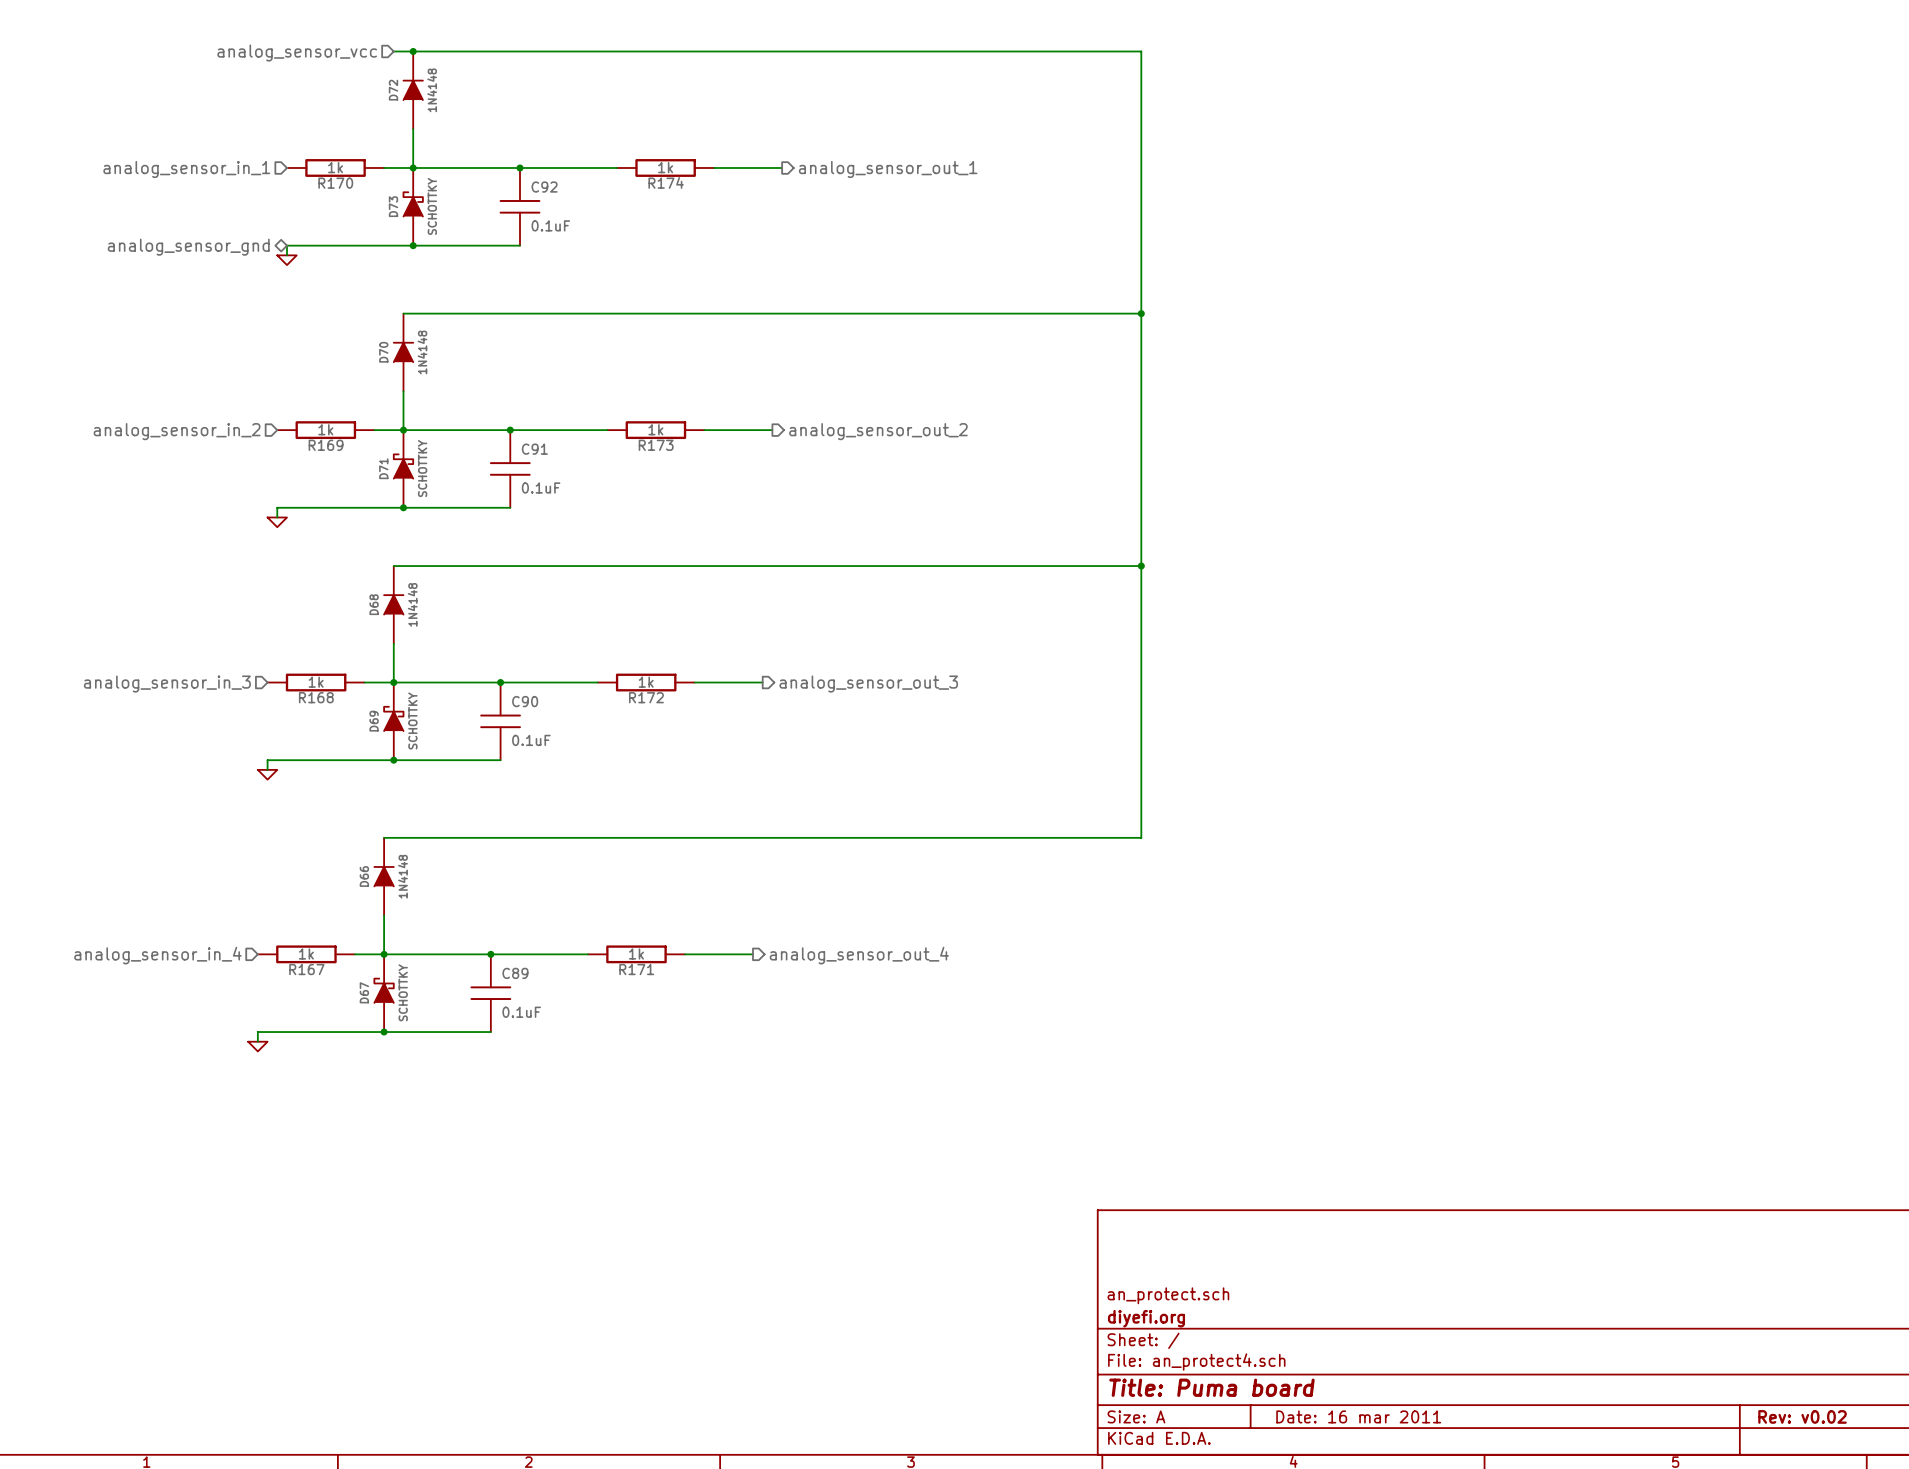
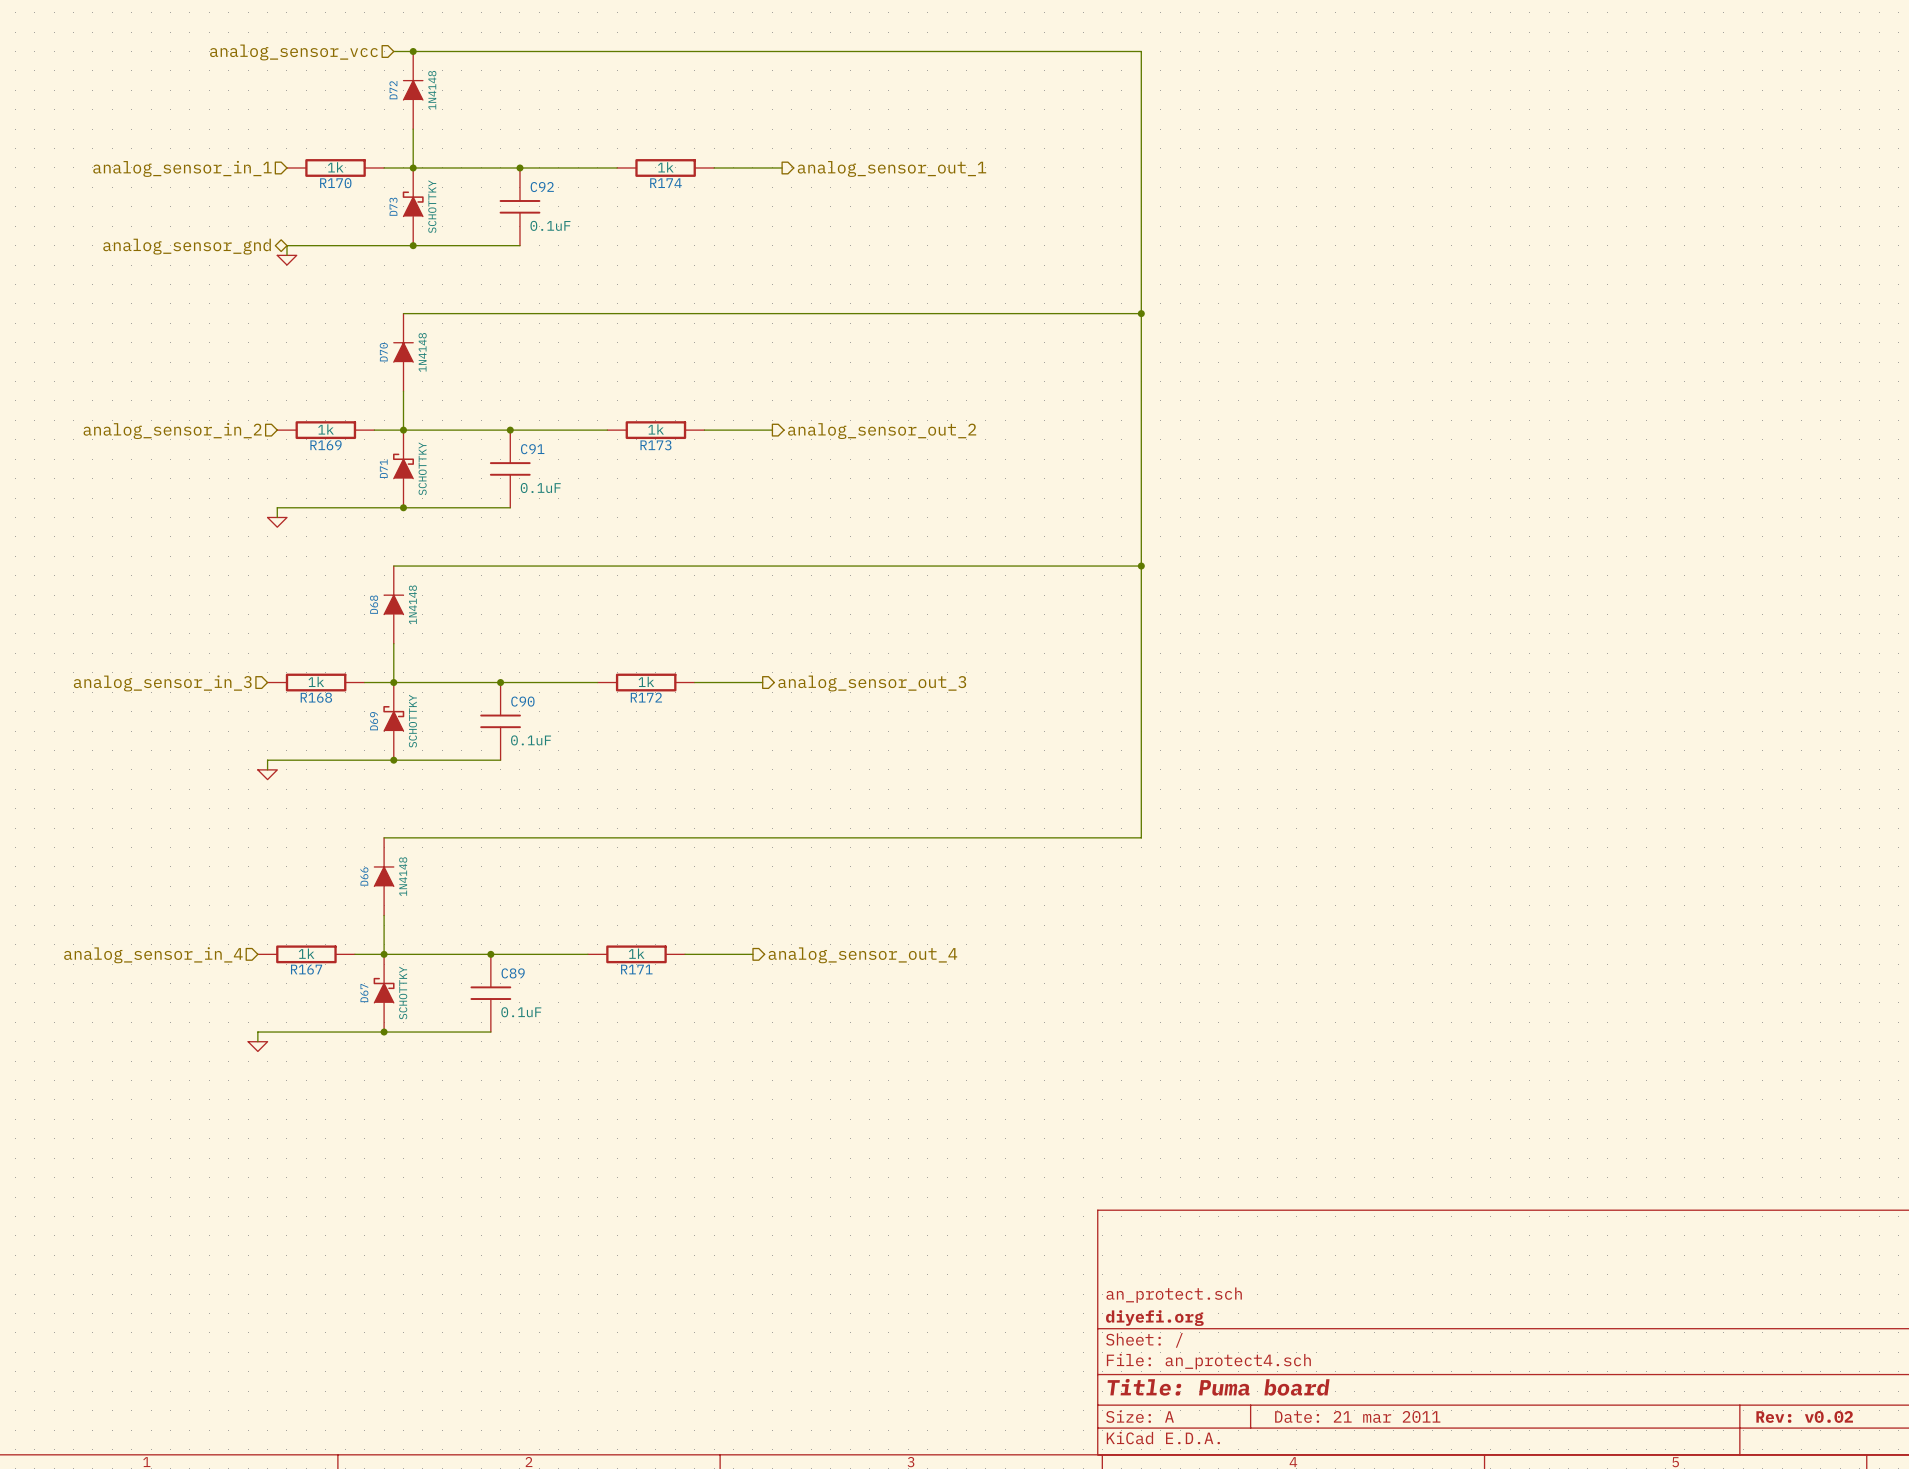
title block: Date: 16 mar 2011 (1358, 1416) -> Date: 21 mar 2011 (1357, 1416)

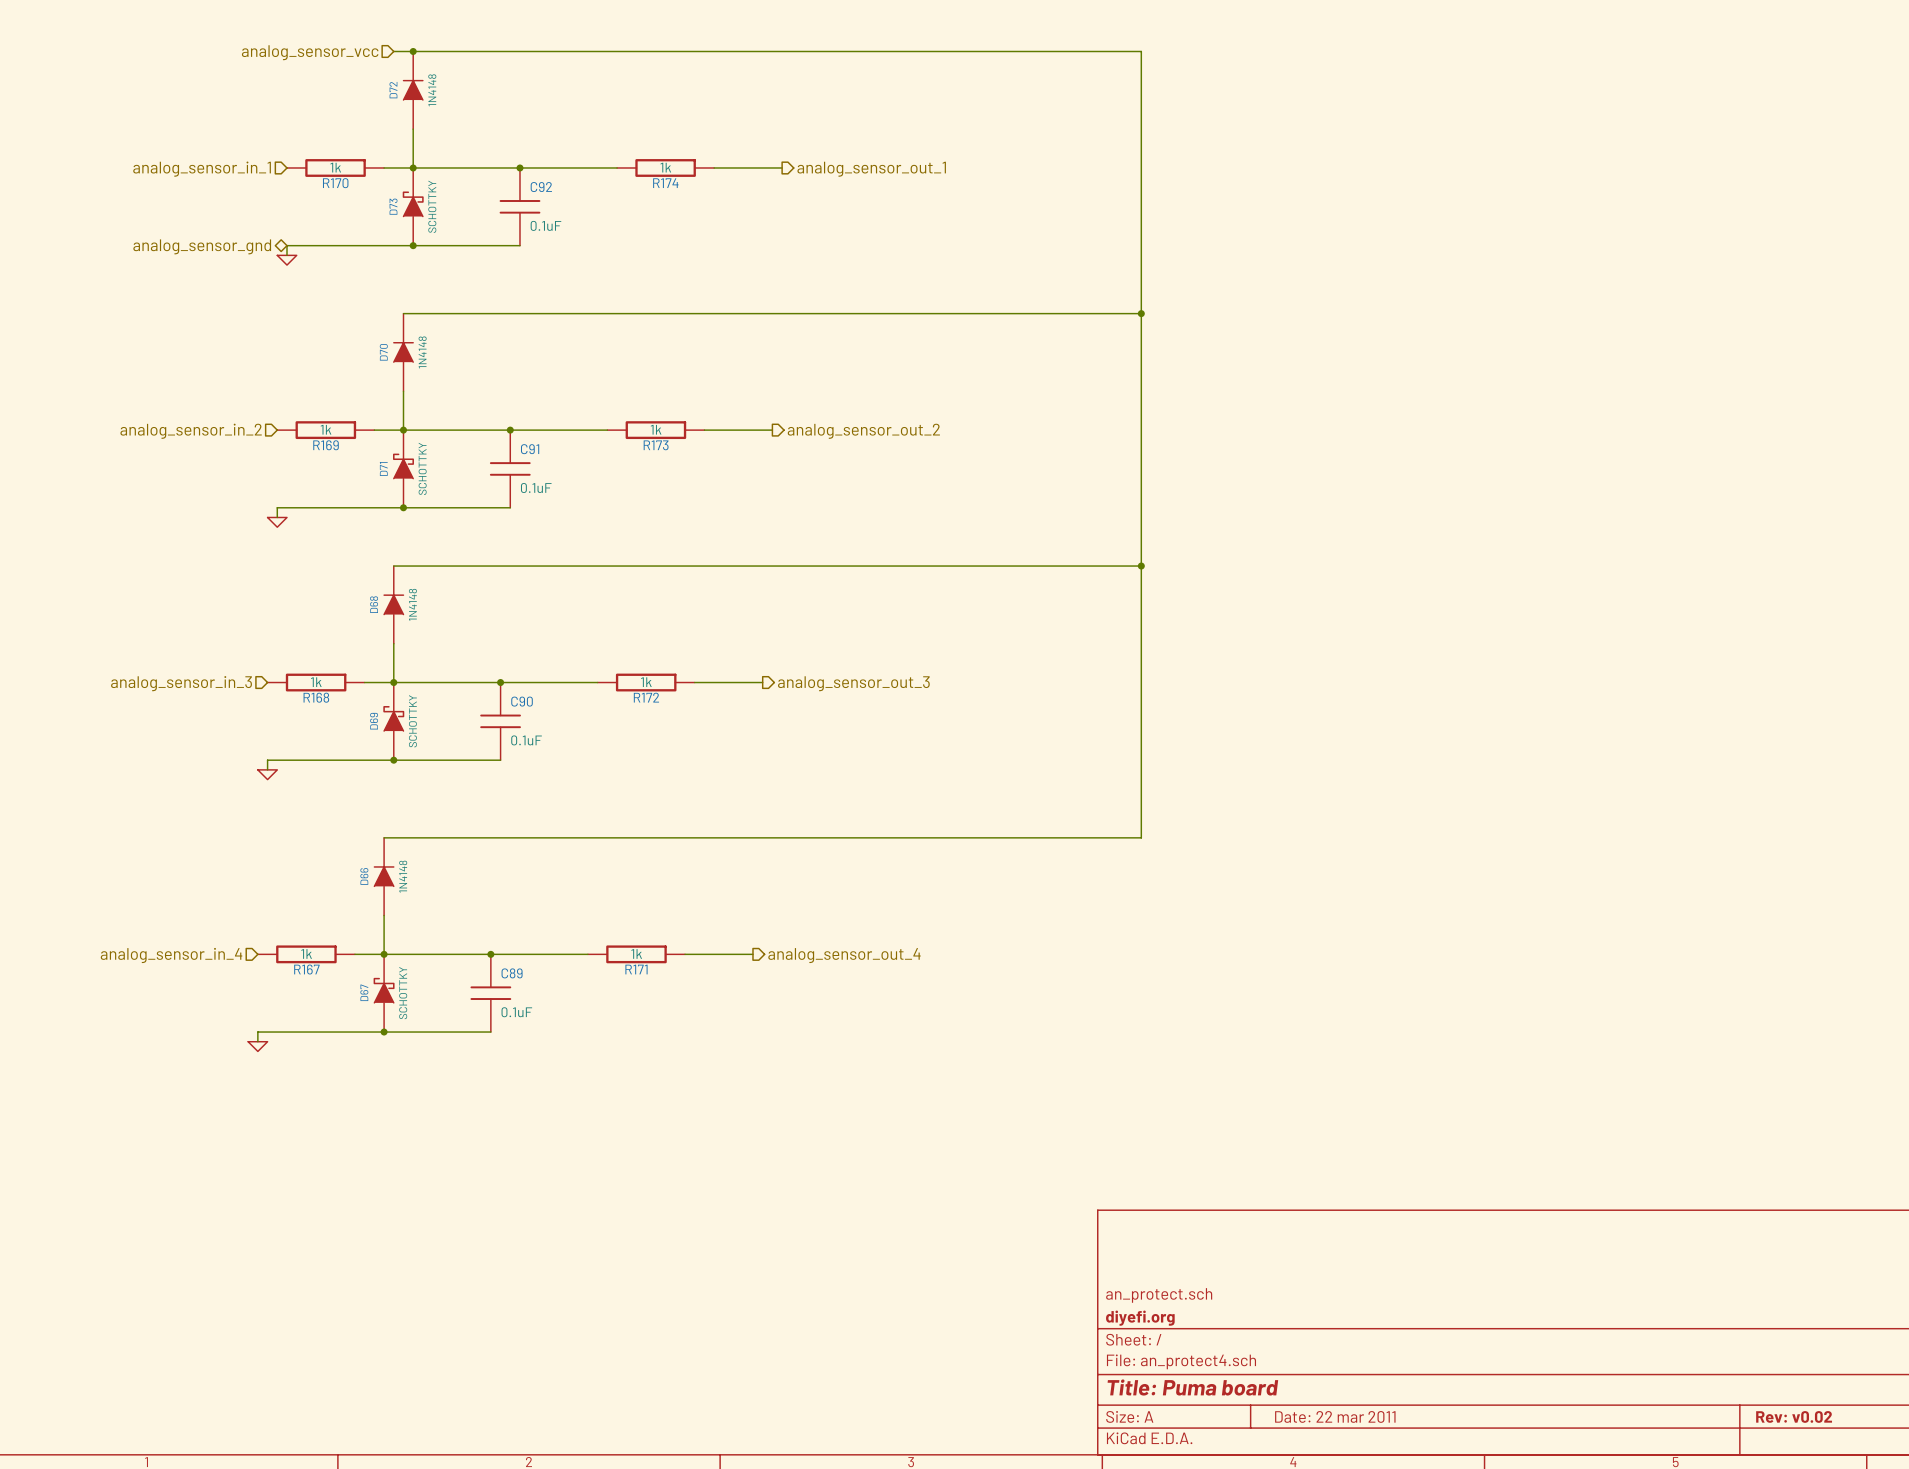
title block: Date: 21 mar 2011 (1357, 1416) -> Date: 22 mar 2011 (1335, 1416)

